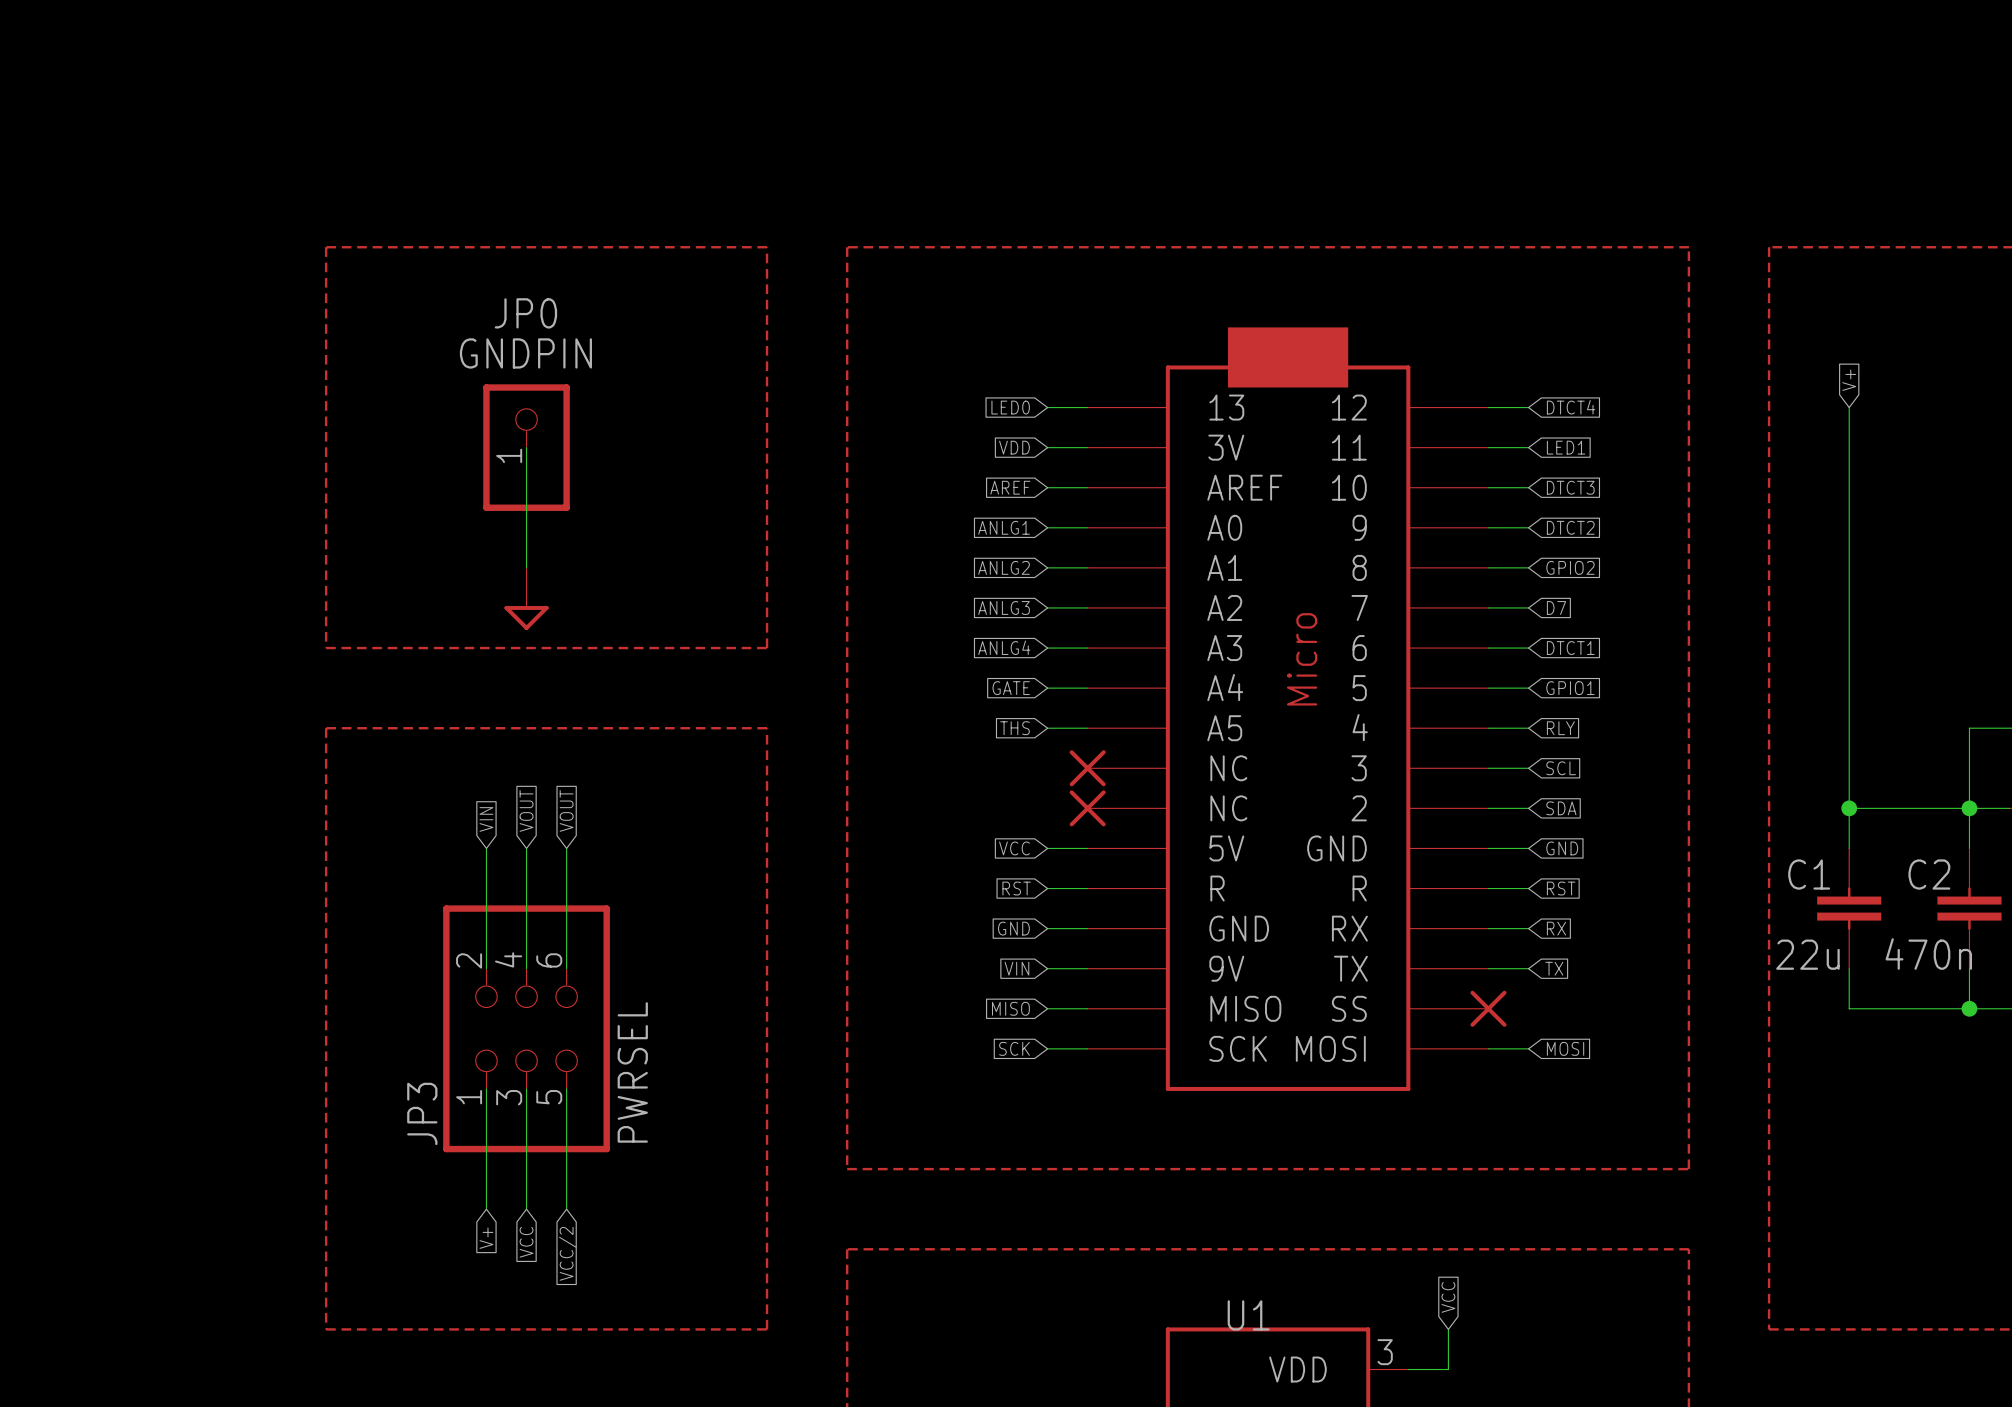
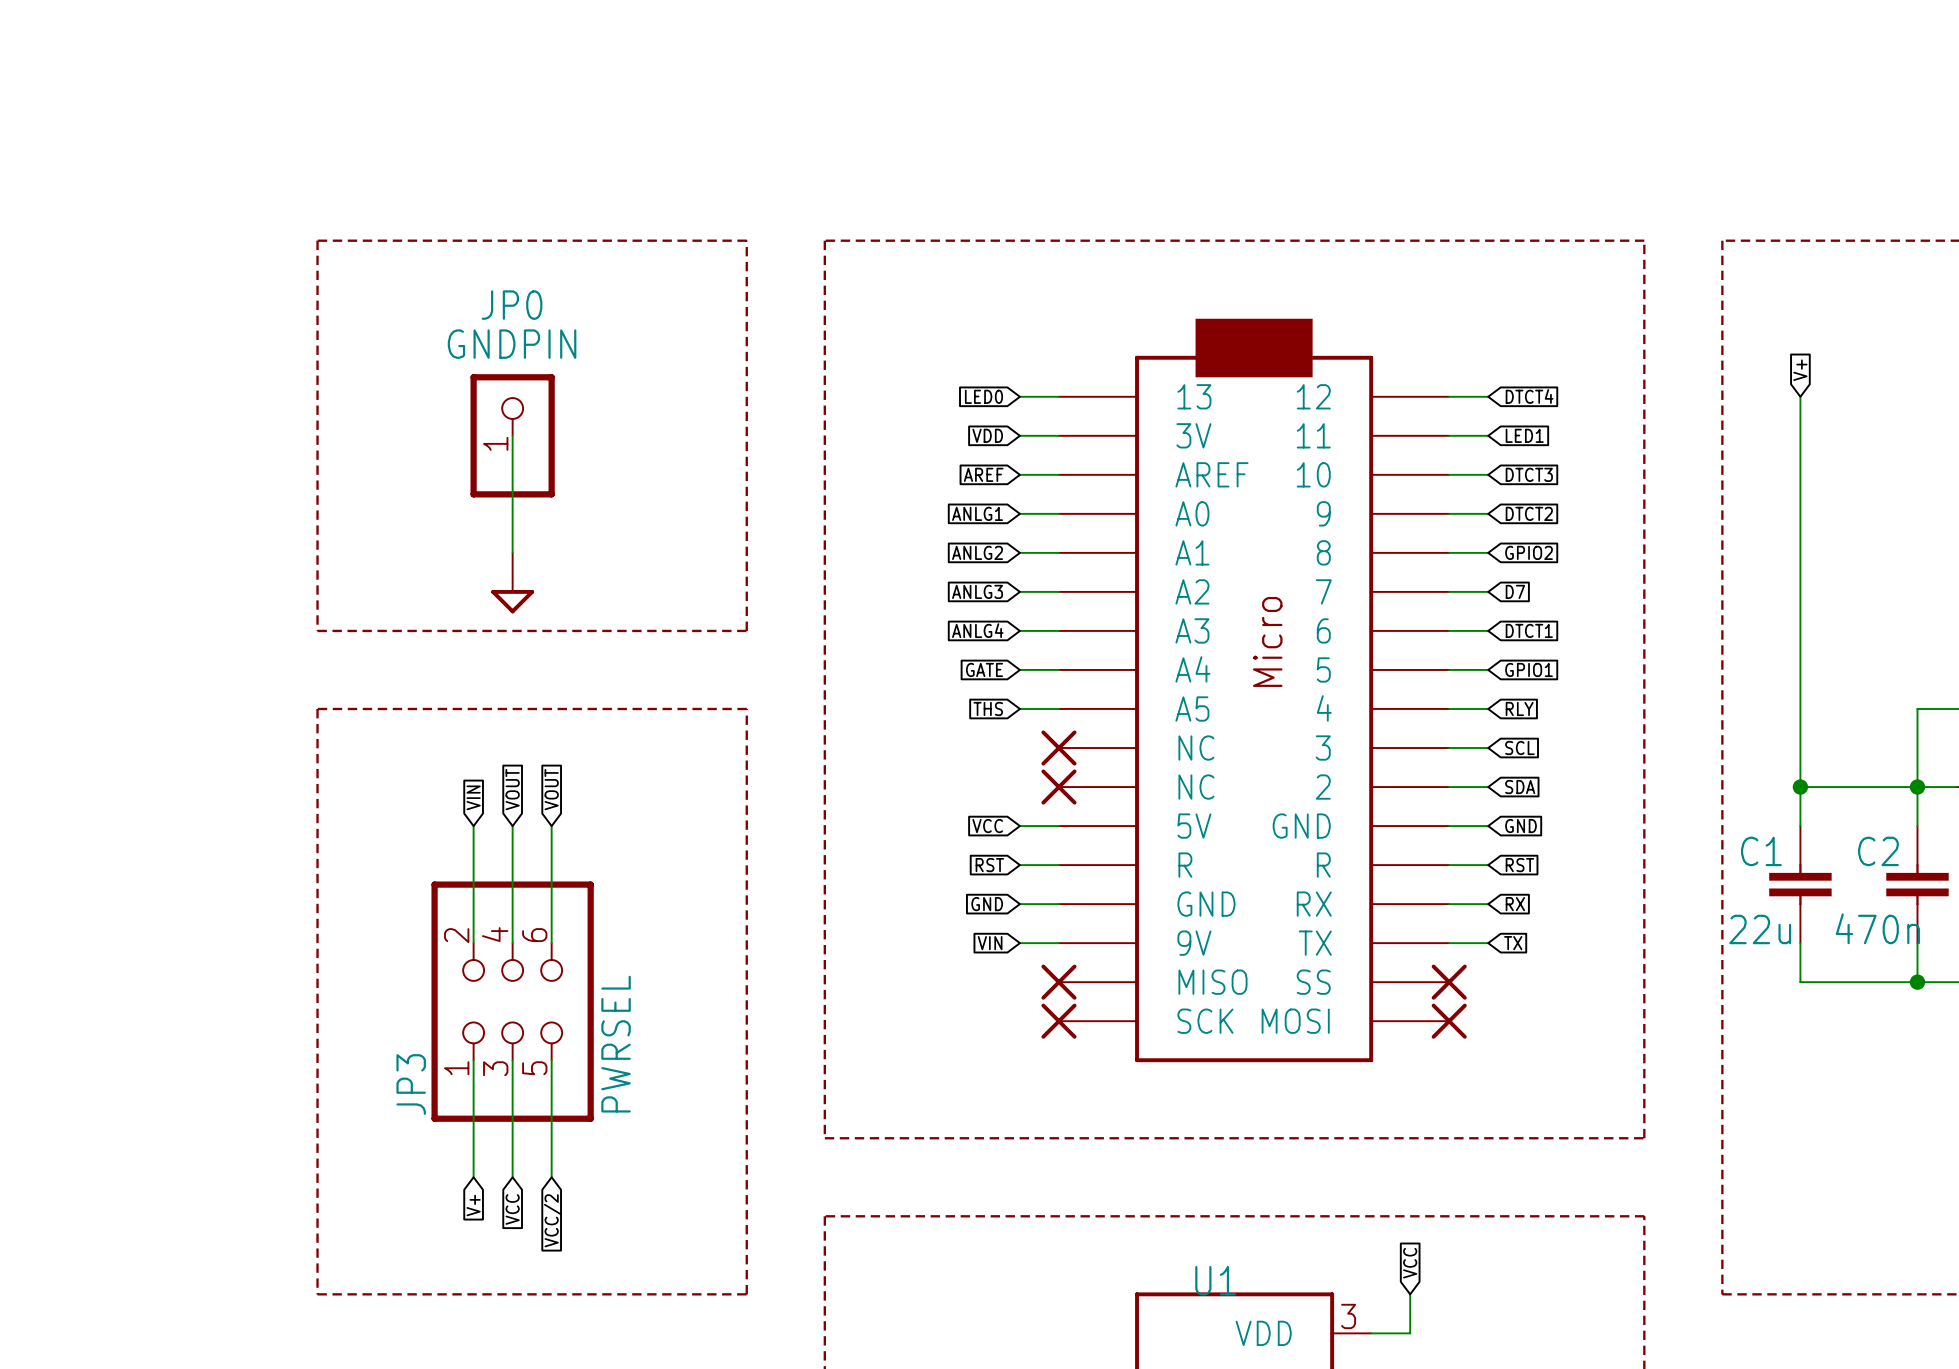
global label: MISO (1010, 1008) -> none
wire: (1047, 1008) (1087, 1008) -> none
part: none -> (1058, 982)
global label: SCK (1014, 1048) -> none
wire: (1047, 1048) (1087, 1048) -> none
part: none -> (1058, 1021)
wire: (1488, 1048) (1528, 1048) -> none
part: none -> (1449, 1021)
global label: MOSI (1565, 1048) -> none

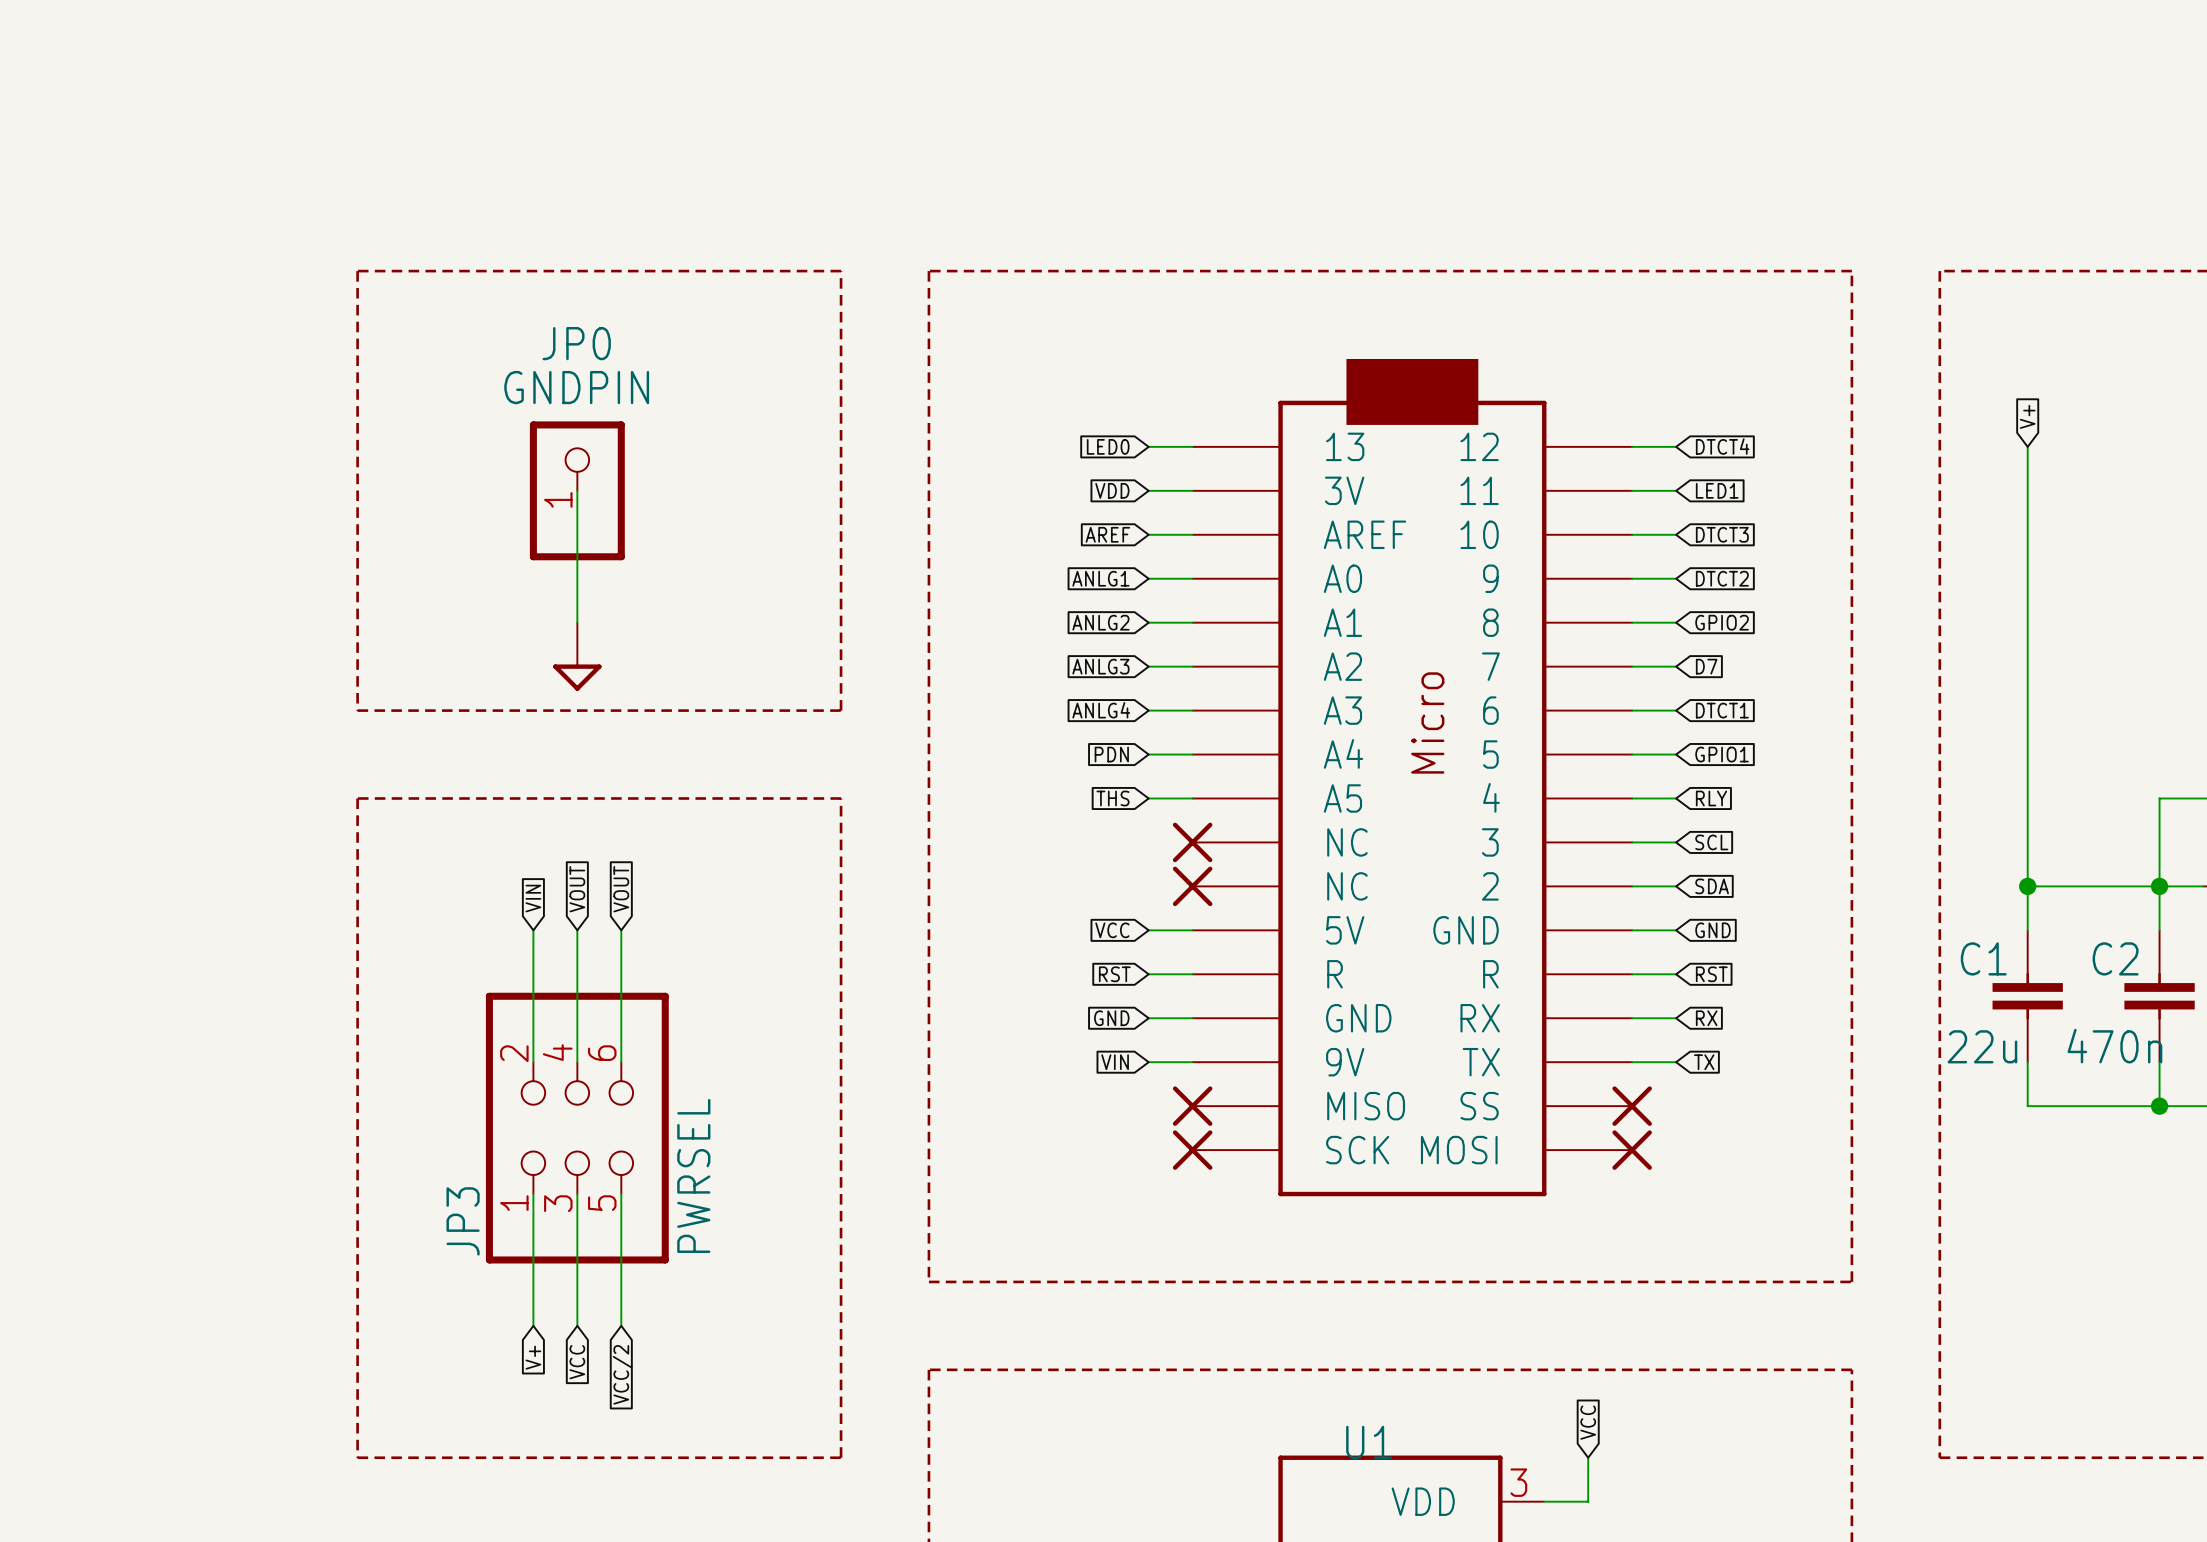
global label: GATE (984, 669) -> PDN (1111, 754)

